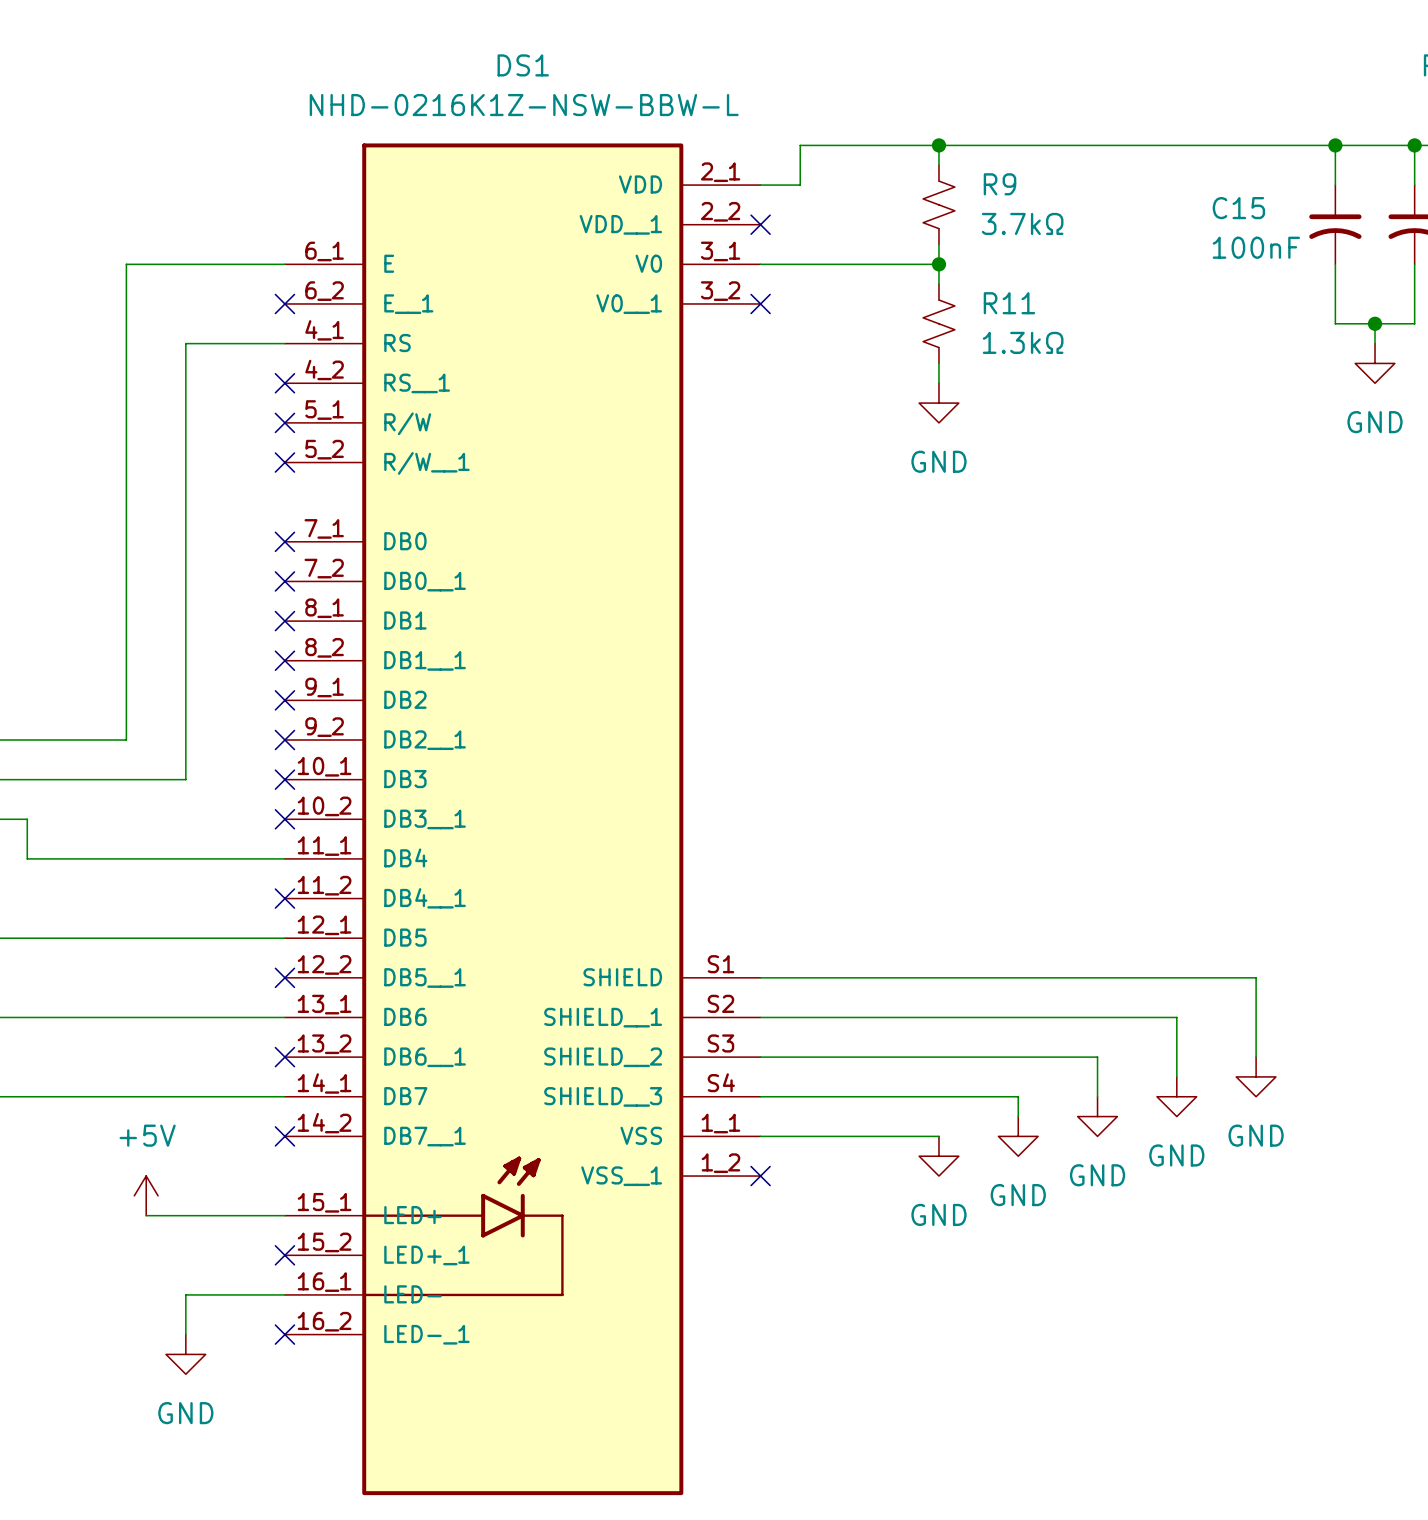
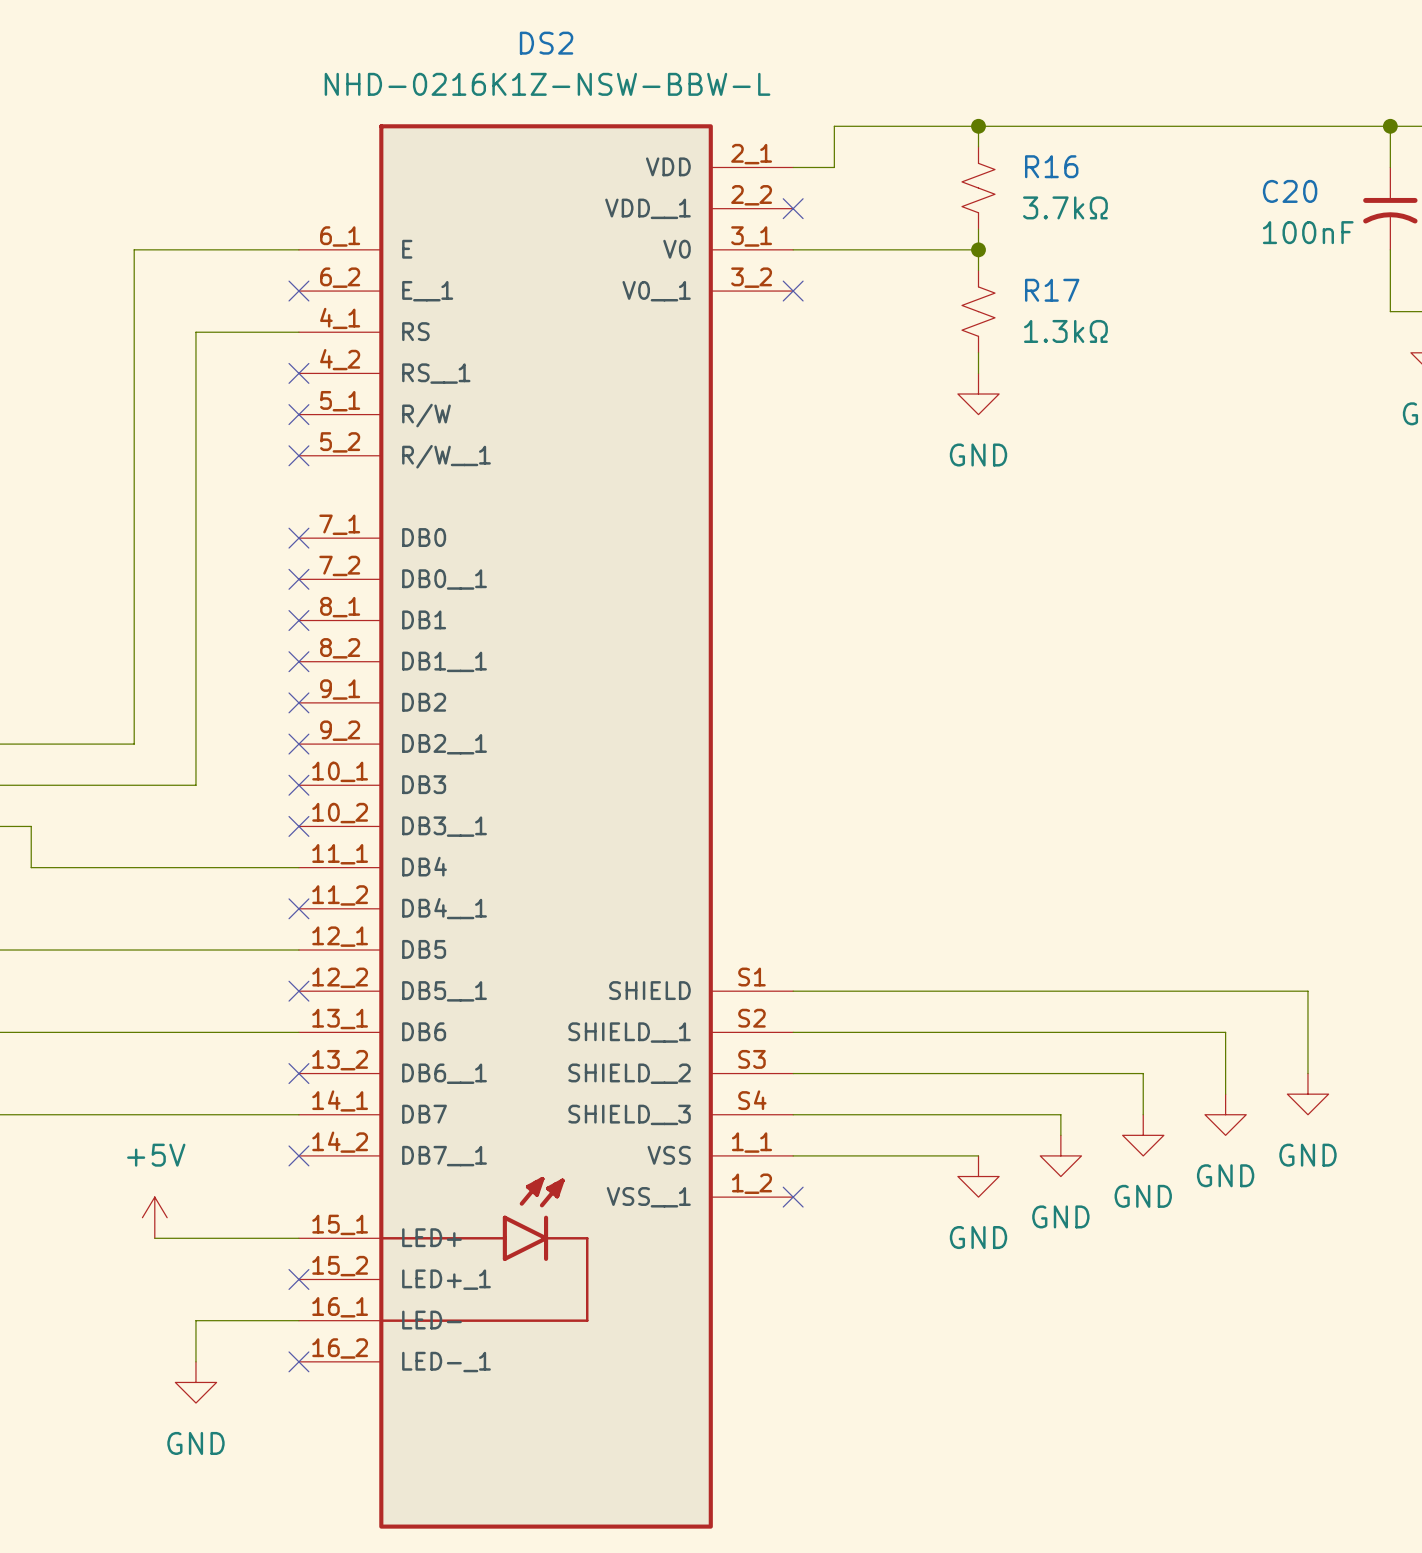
DS1 name: DS1 (523, 65) -> DS2 (546, 43)
R9 name: R9 (1000, 184) -> R16 (1051, 166)
C15 name: C15 (1238, 208) -> C20 (1290, 191)
R11 name: R11 (1009, 303) -> R17 (1052, 290)

